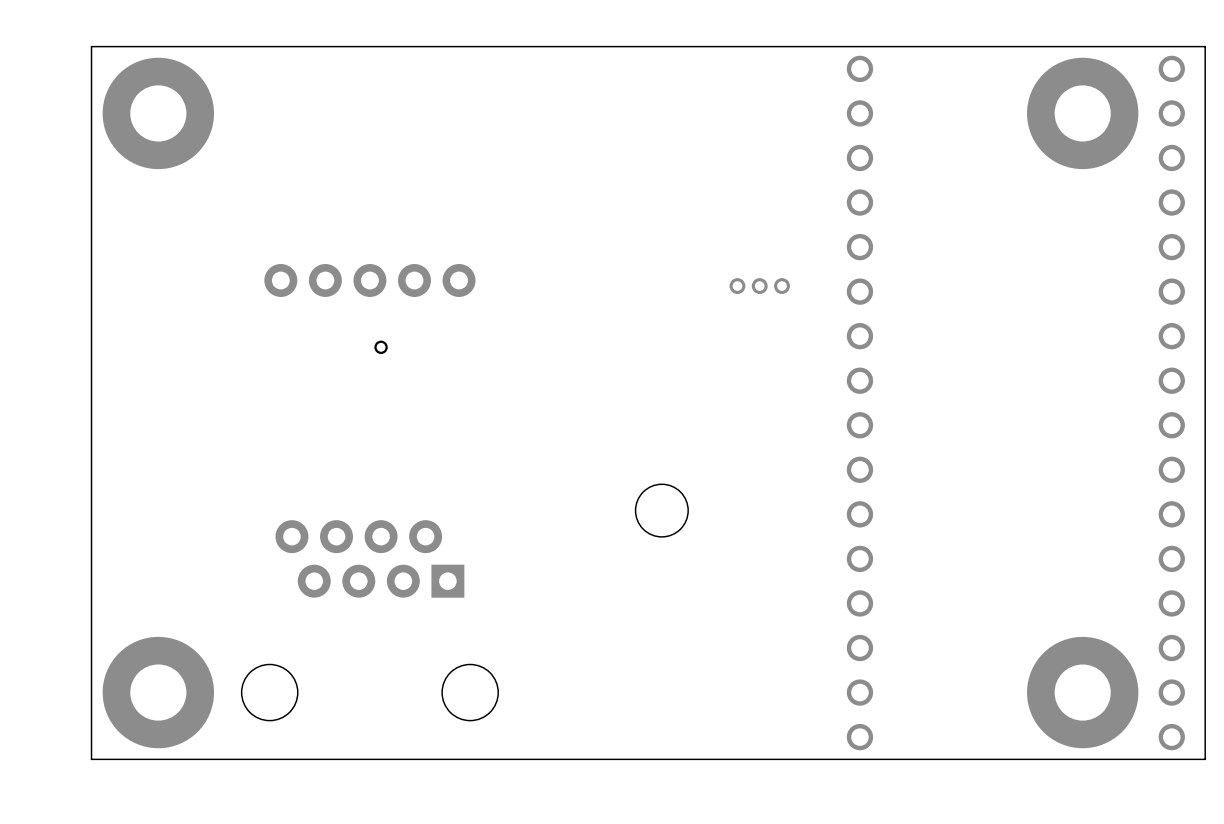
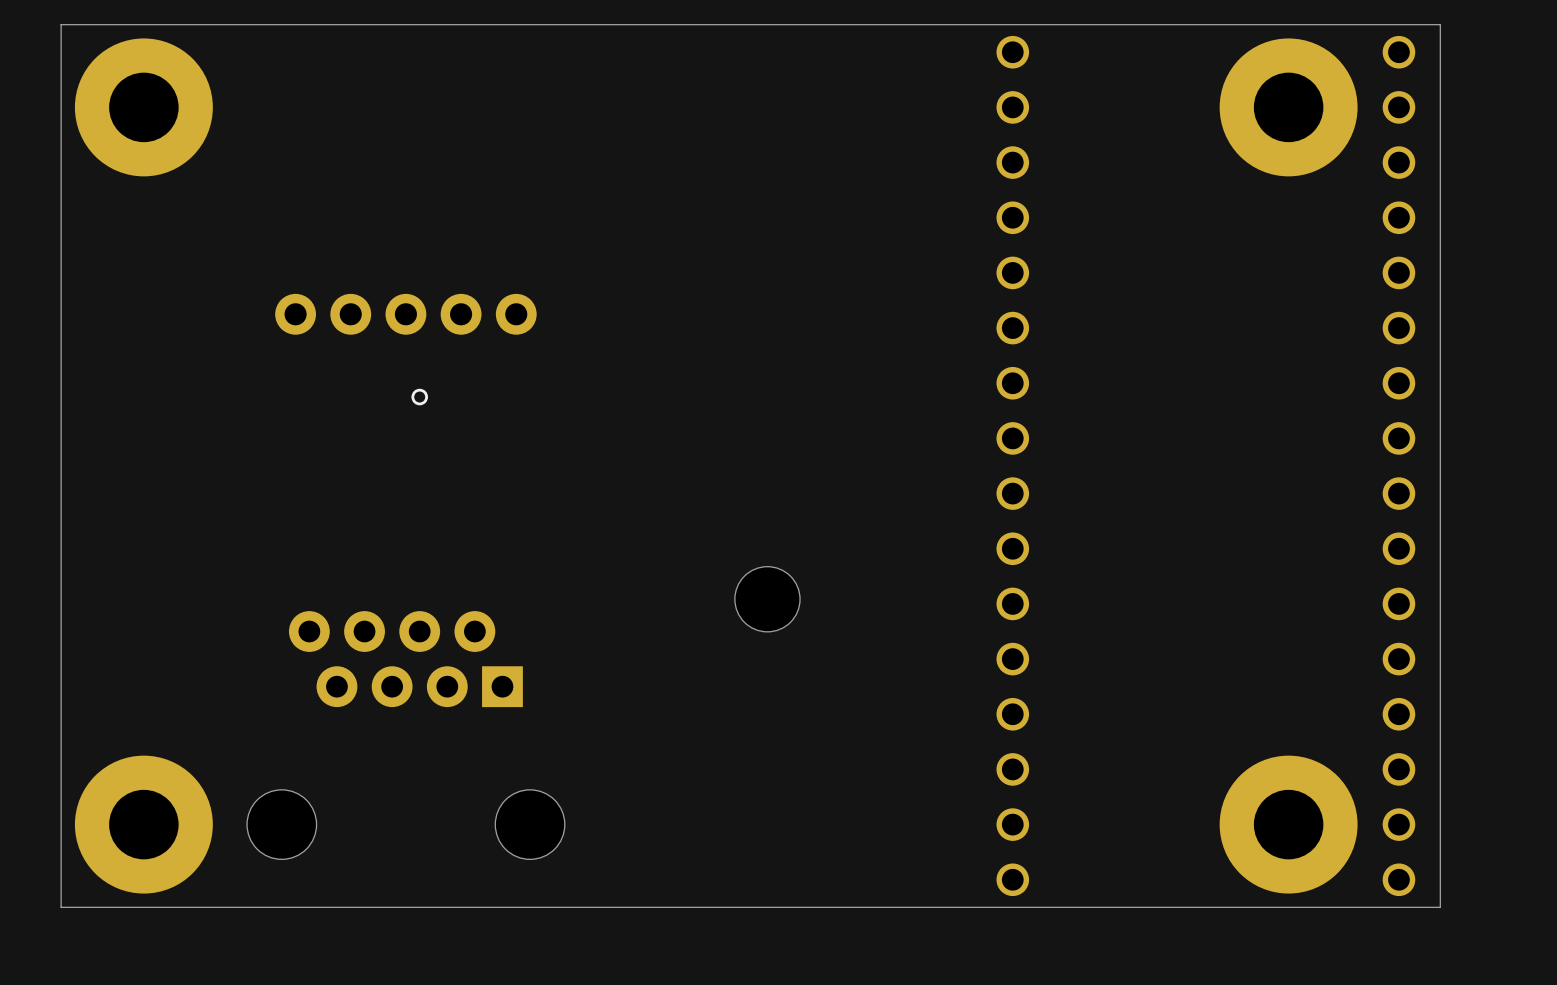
part: (759, 286) -> none

